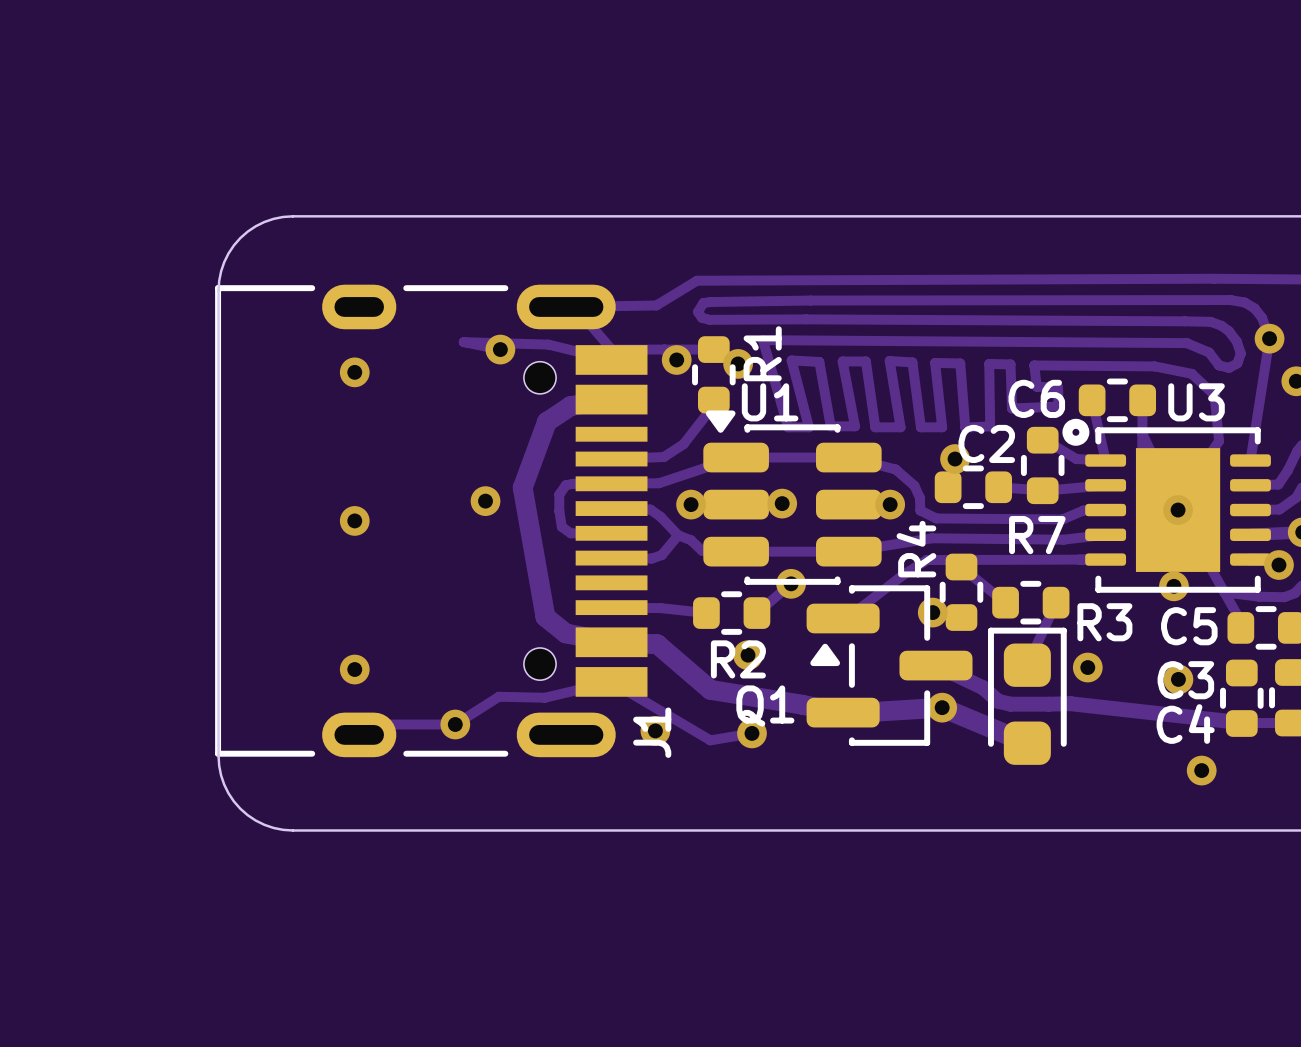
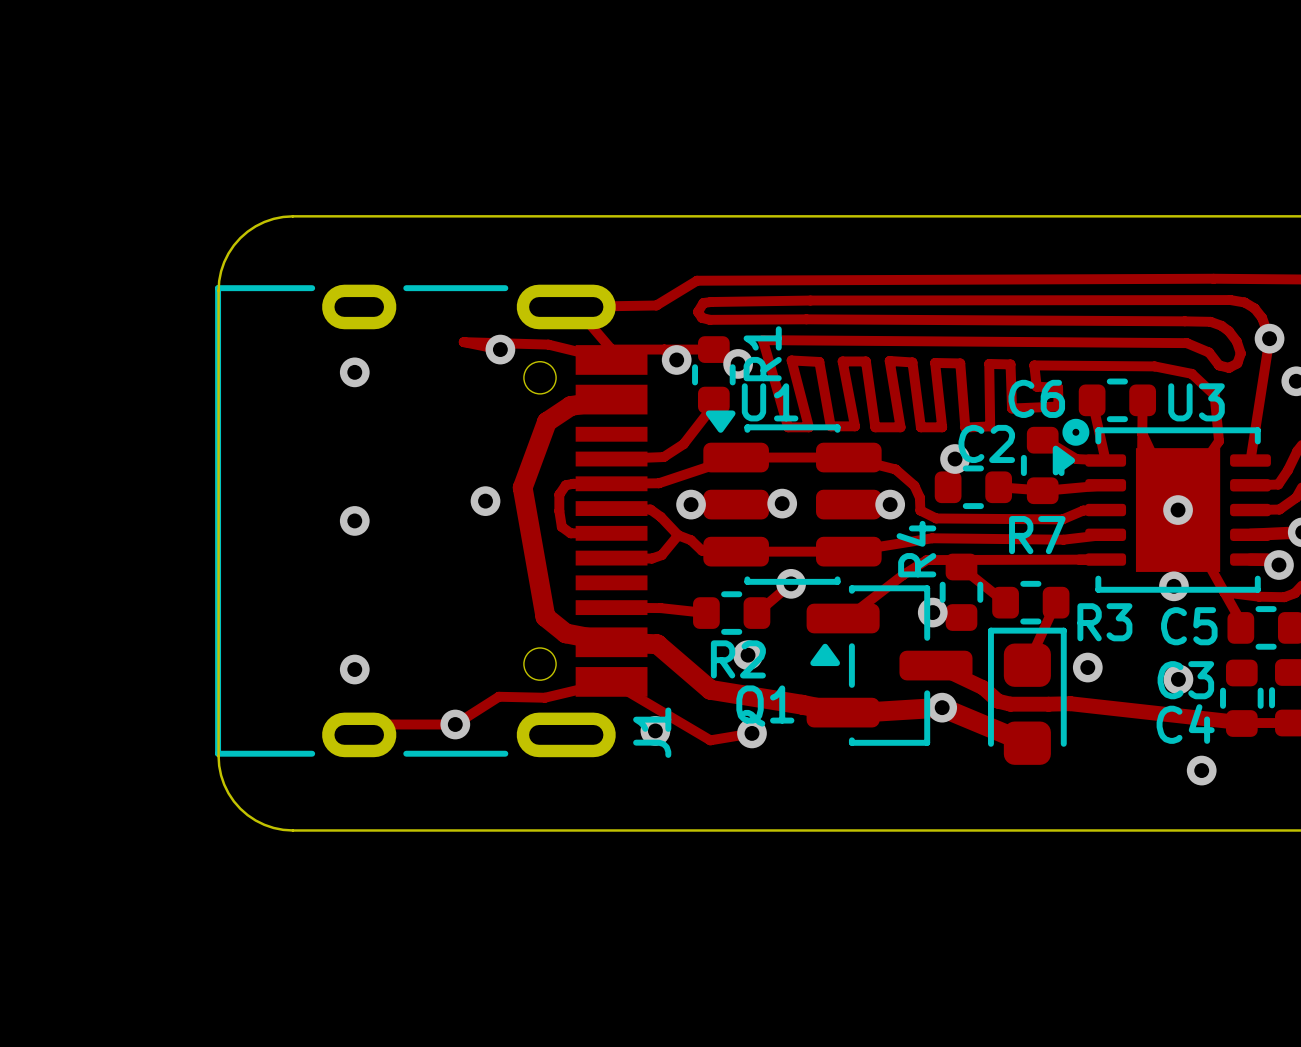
U3 footprint: [1085, 427, 1271, 593] -> [1052, 427, 1271, 593]

